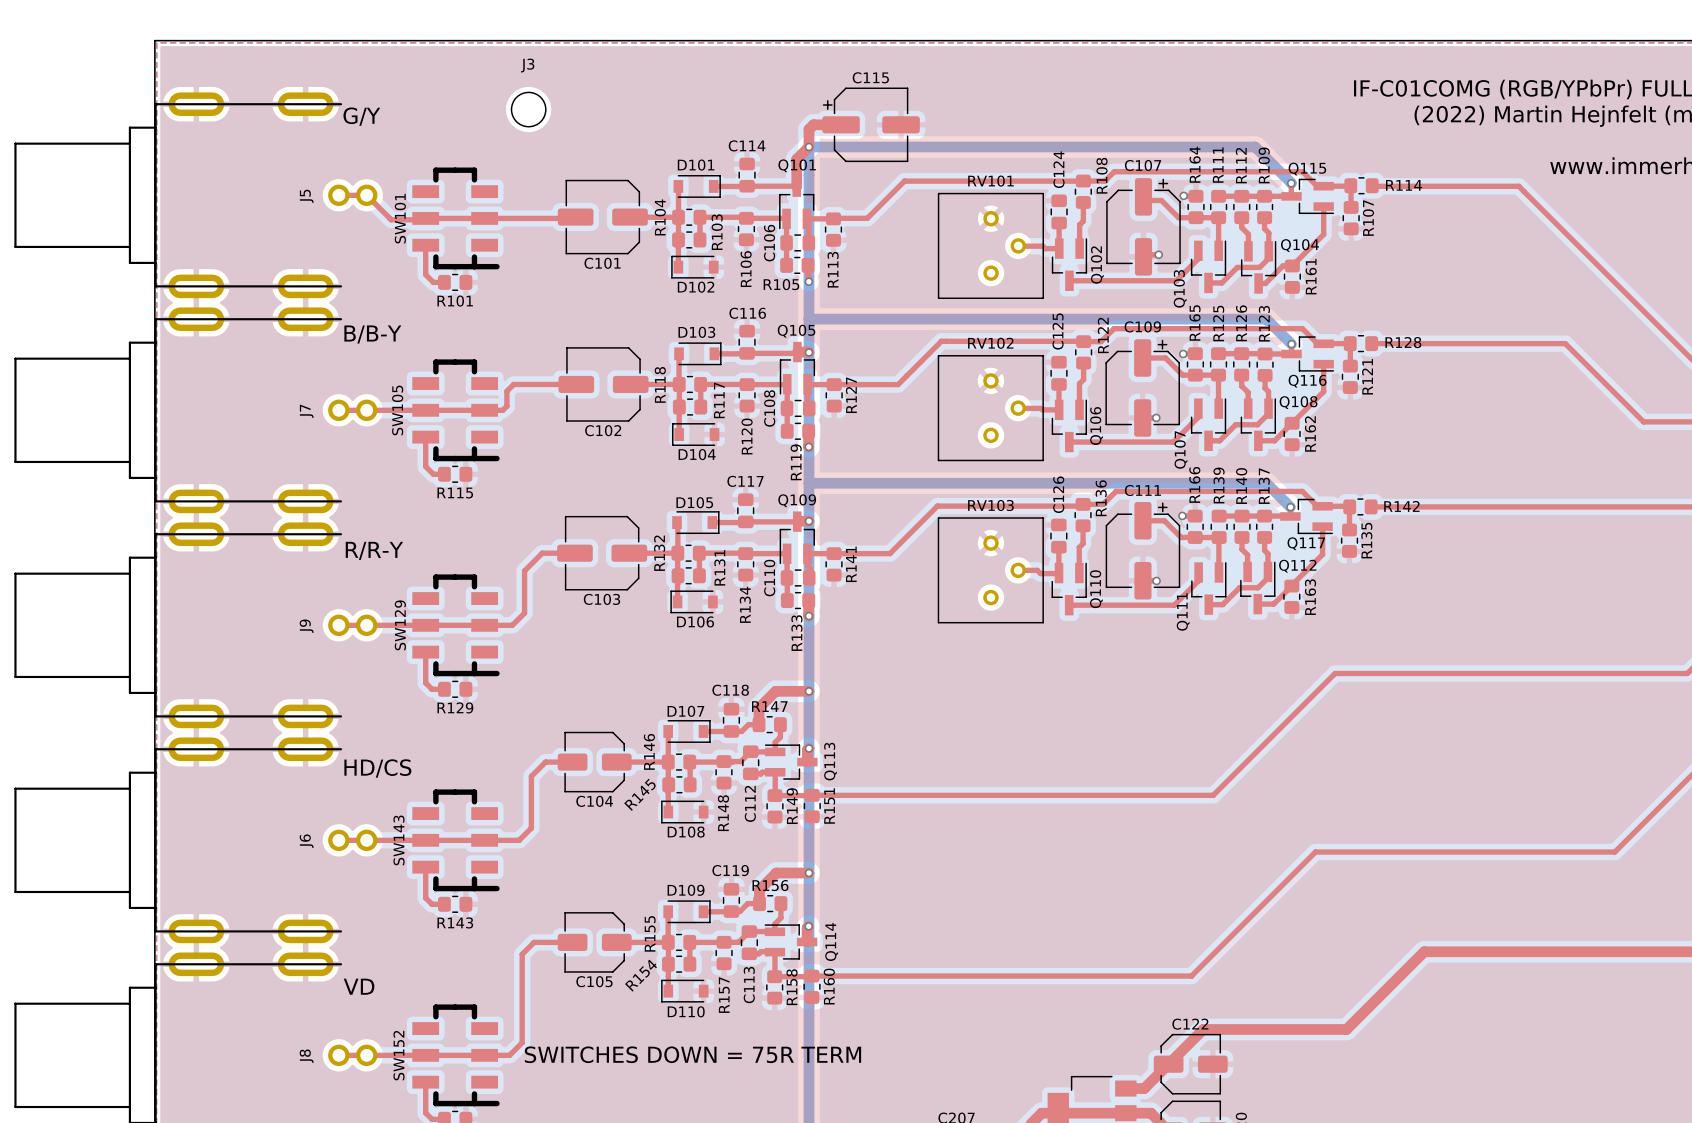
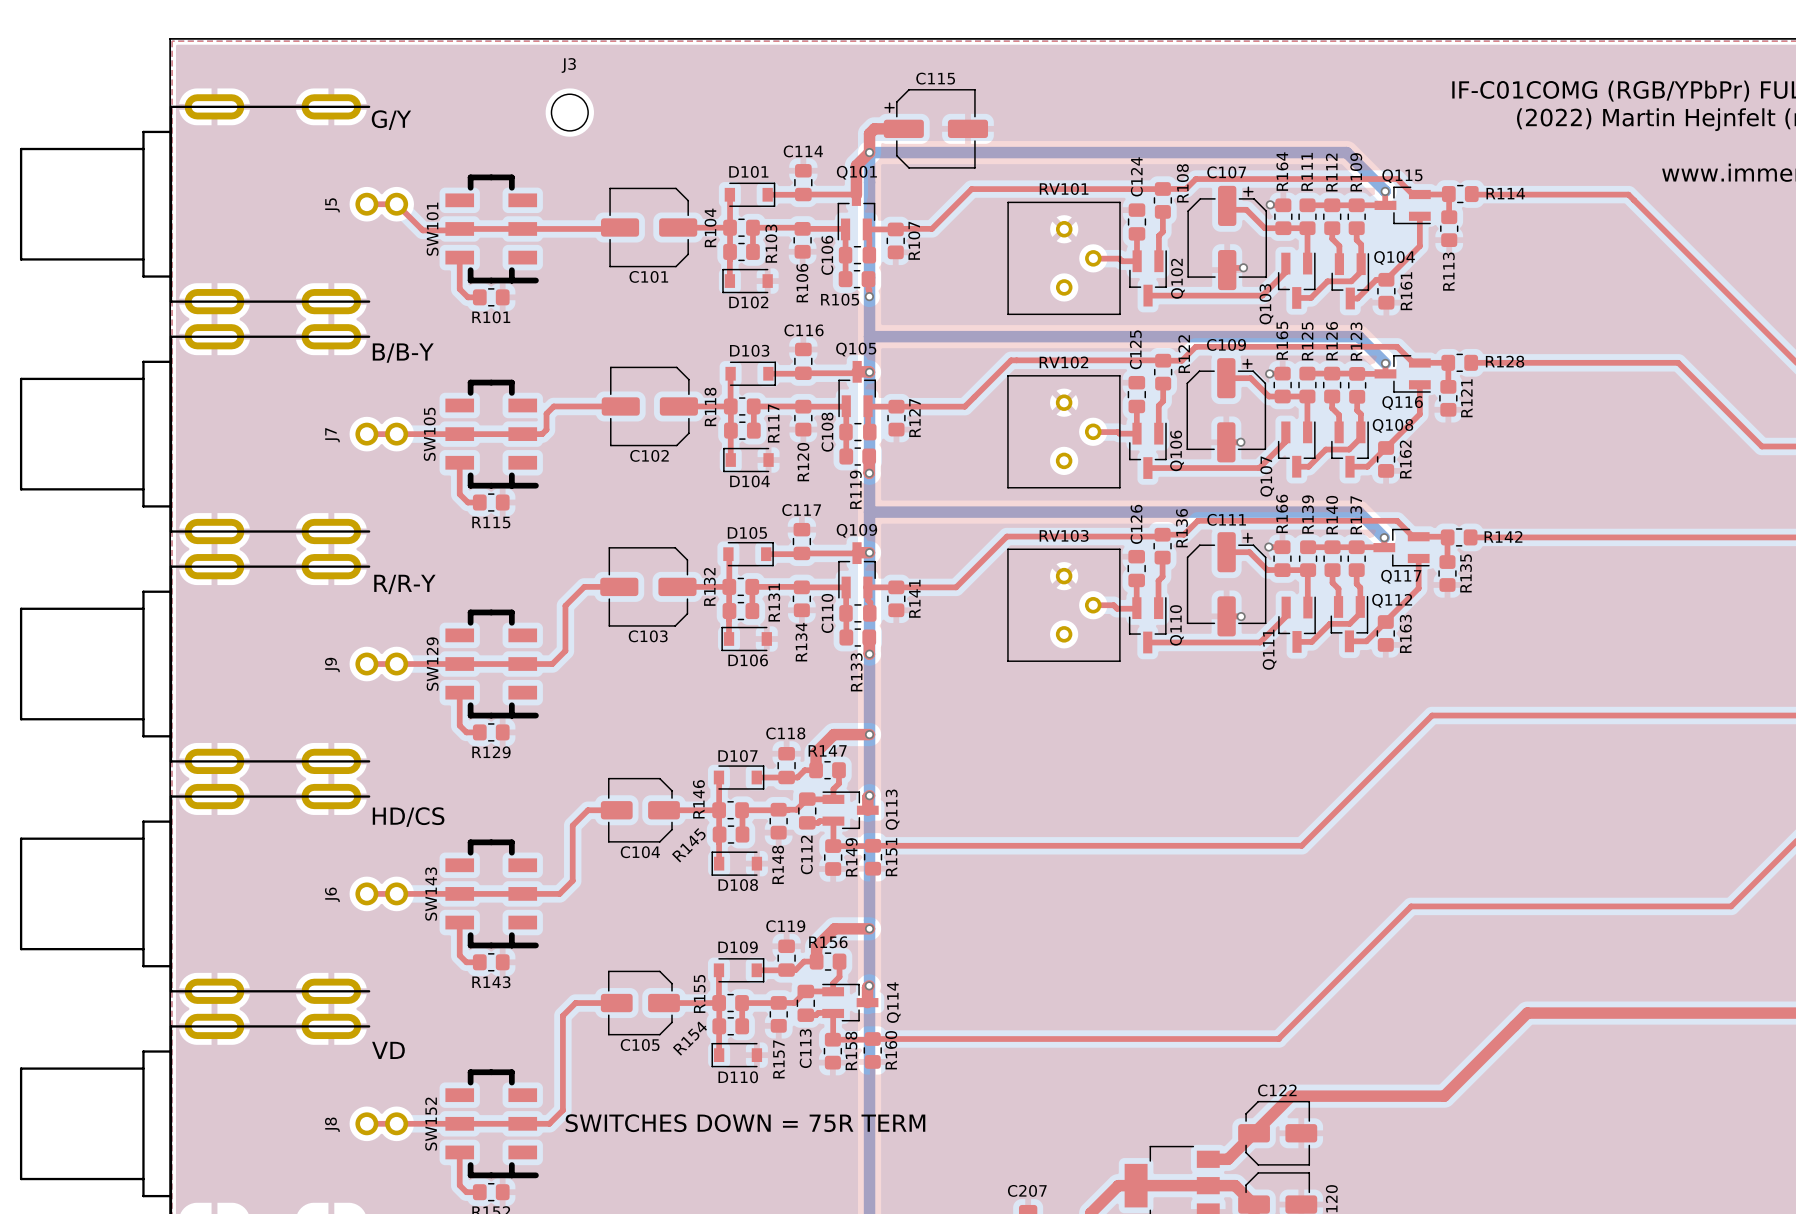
R107 name: R107 (1368, 218) -> R113 (1448, 271)
R113 name: R113 (833, 269) -> R107 (914, 240)

